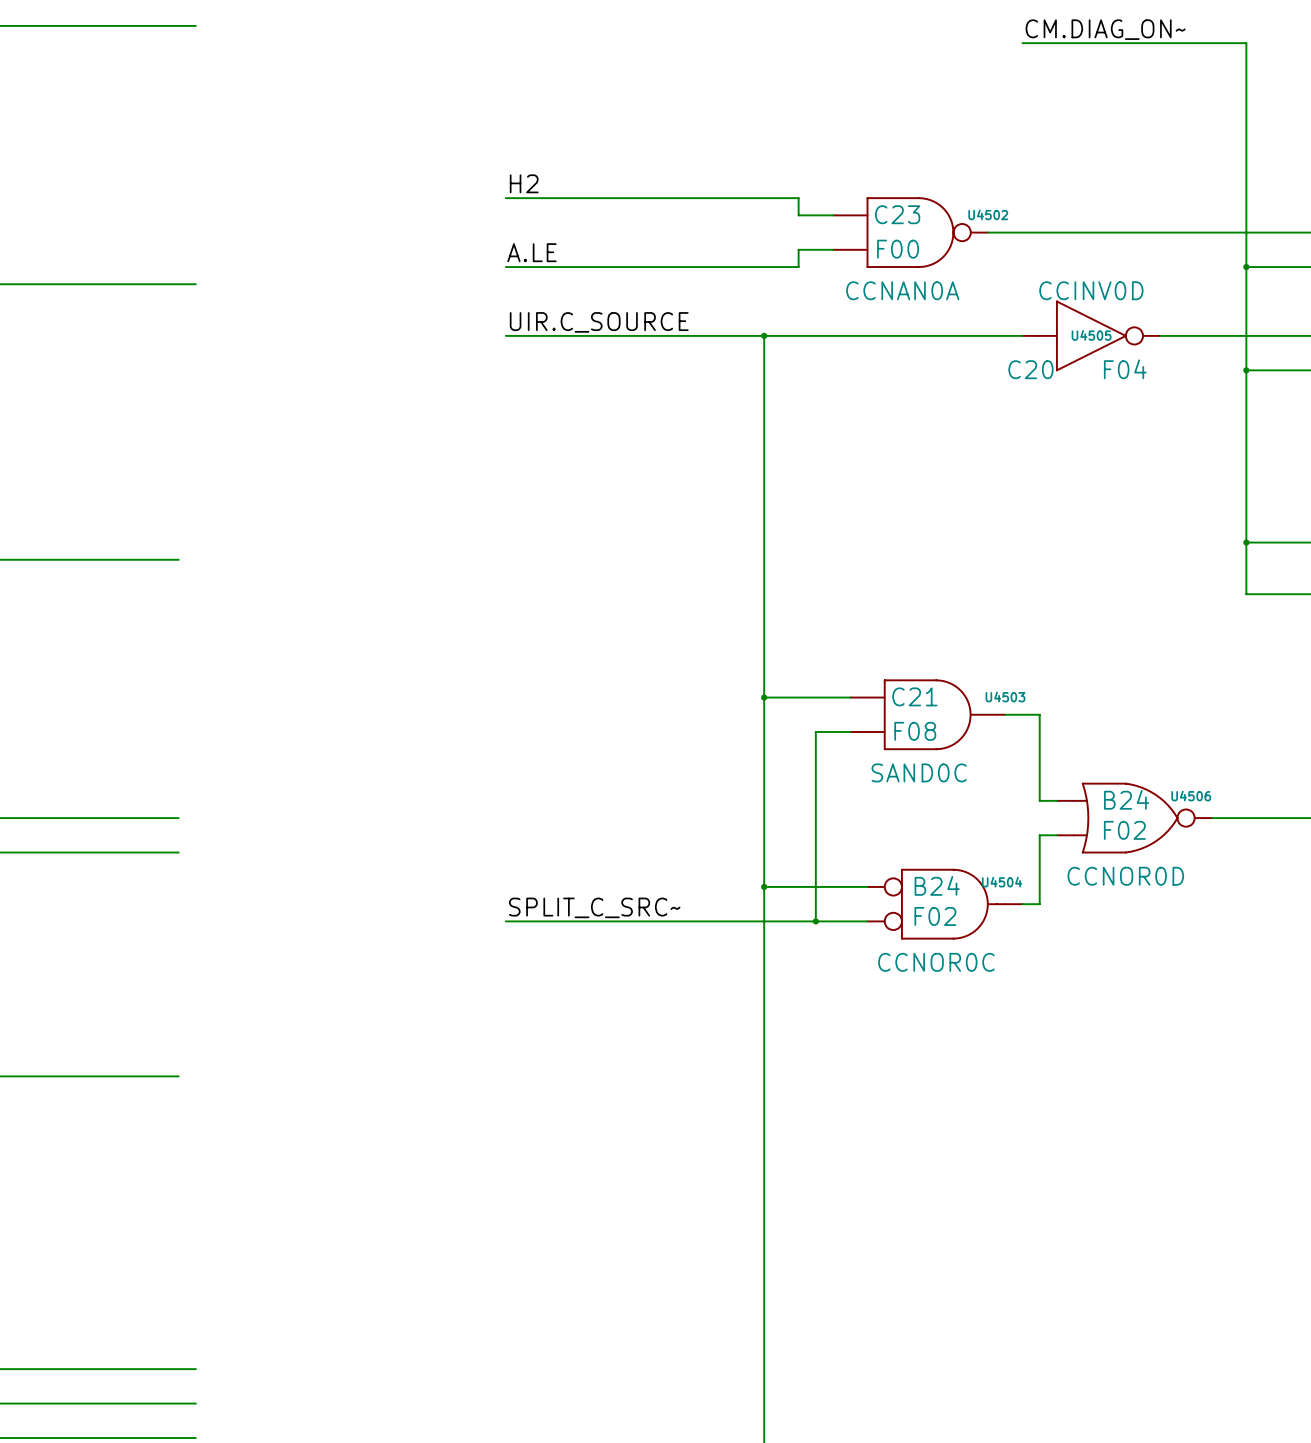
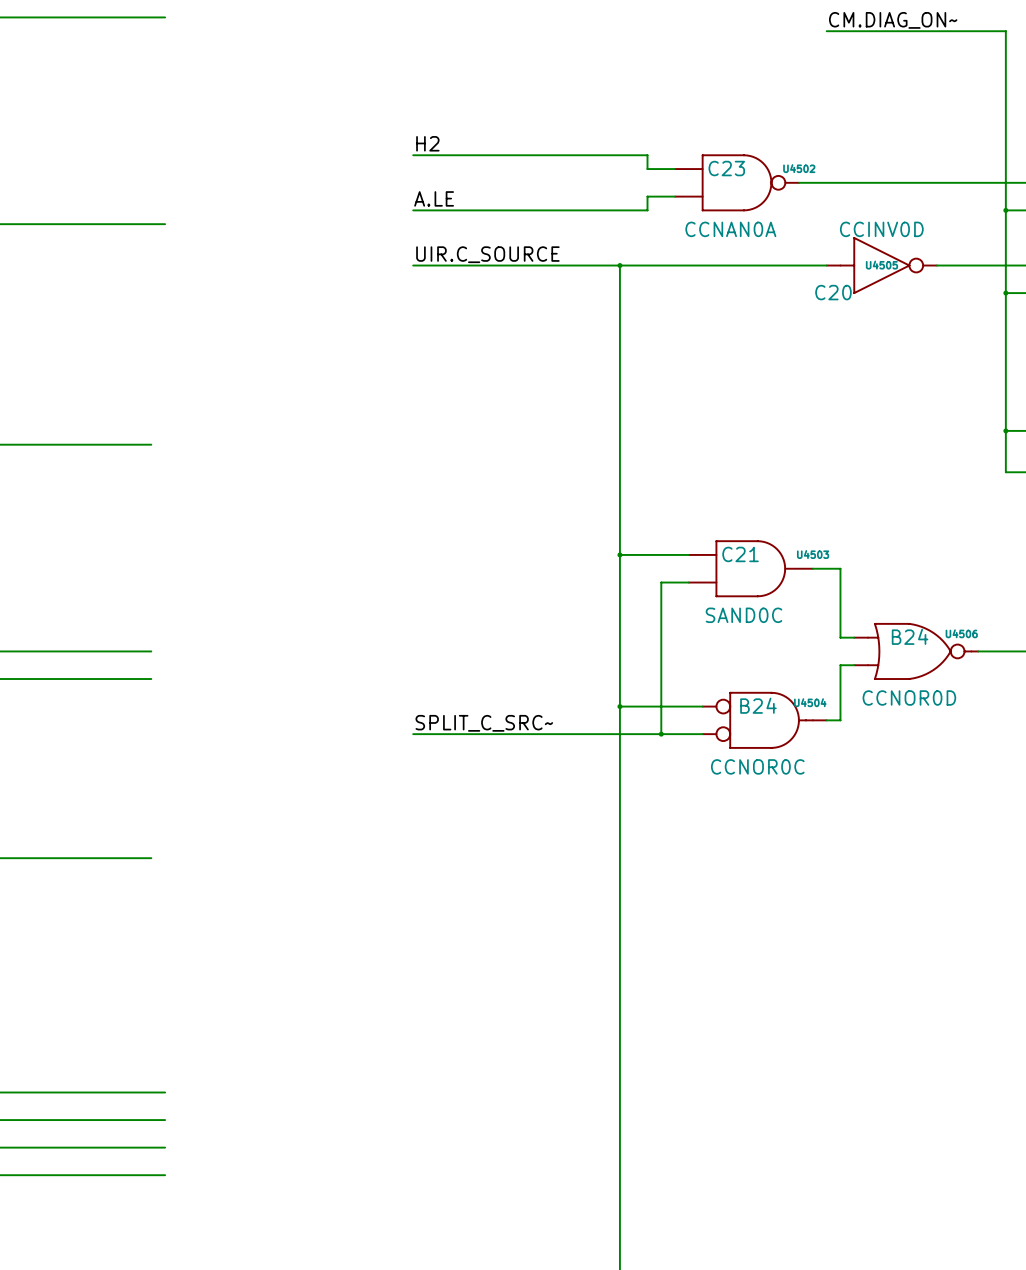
U4502 value: F00 (898, 249) -> none
U4505 value: F04 (1125, 369) -> none
U4503 value: F08 (915, 731) -> none
U4506 value: F02 (1124, 830) -> none
U4504 value: F02 (935, 916) -> none

